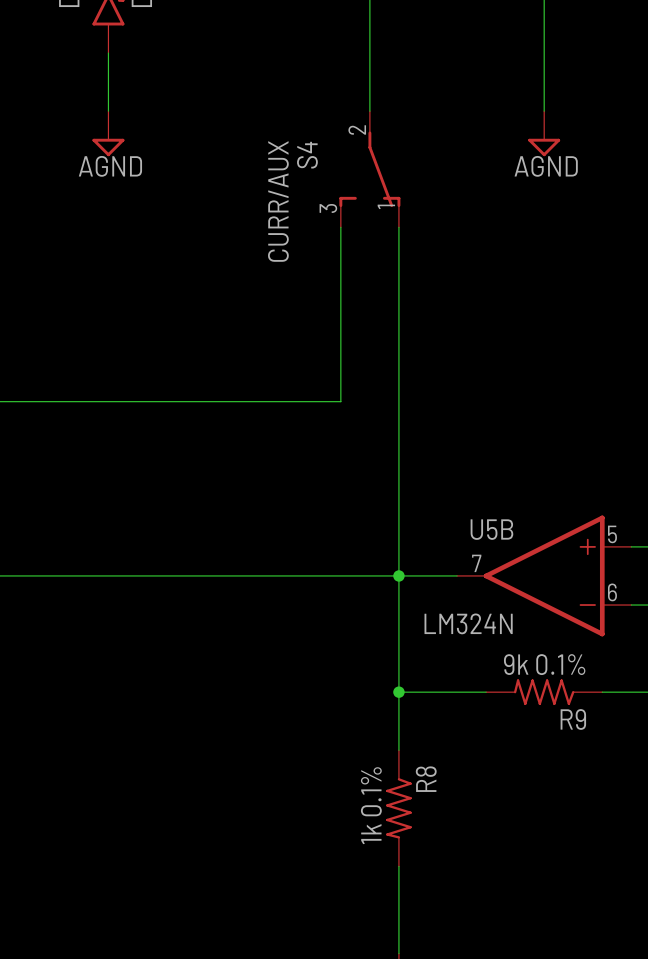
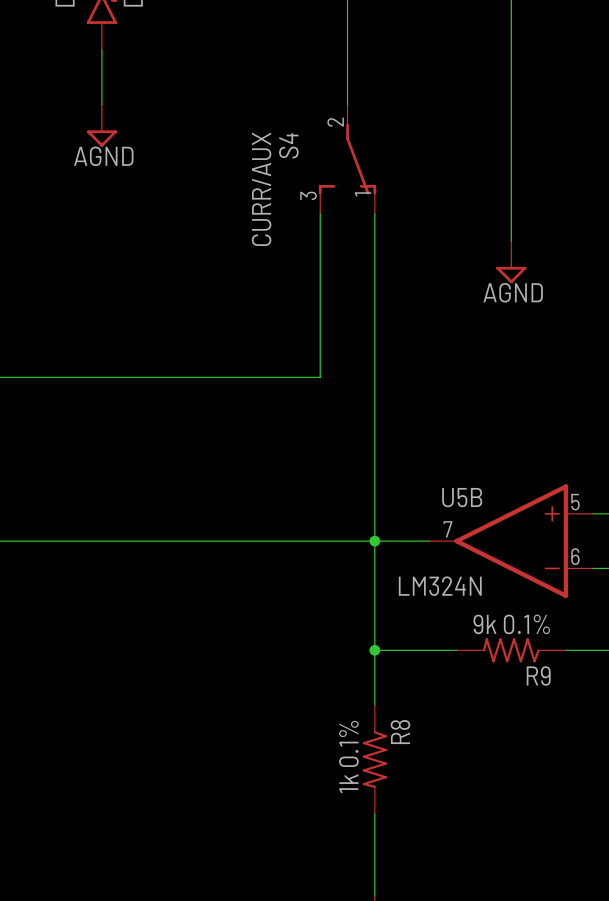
wire: none -> (511, 104) (511, 240)
power symbol: AGND (544, 133) -> none
power symbol: none -> AGND (511, 262)

